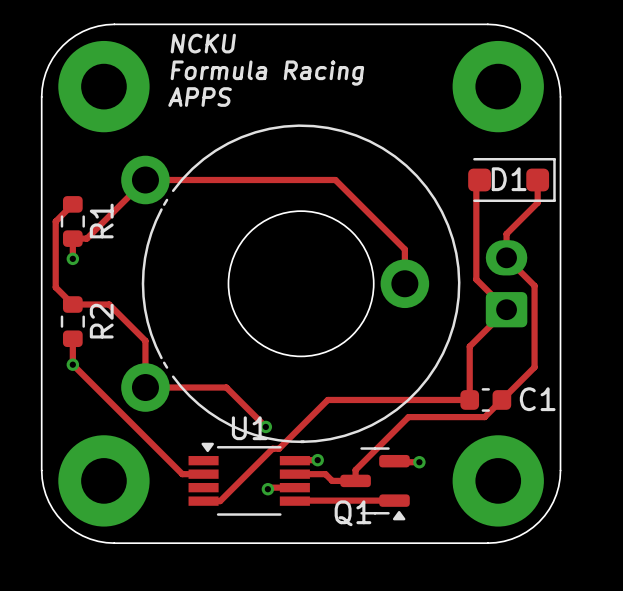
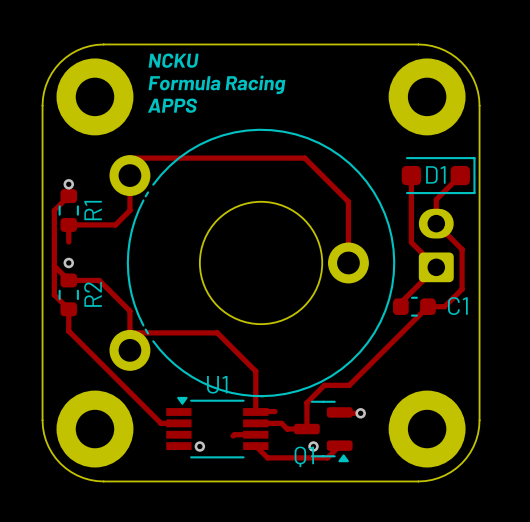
track: (479, 180) (476, 183) (476, 279) (506, 309) (469, 346) (469, 399) (327, 399) (279, 448) (272, 448) (220, 501) (203, 501) -> (411, 175) (411, 242) (436, 267) (400, 302) (400, 306)
track: (537, 180) (537, 202) (506, 233) (506, 257) (534, 285) (534, 367) (484, 417) (408, 417) (355, 470) -> (460, 175) (436, 199) (436, 223) (462, 249) (462, 289) (444, 306) (427, 306) (349, 385) (324, 385) (306, 402) (306, 419)
via: none -> (68, 184)
track: (86, 238) (145, 180) (335, 180) (404, 249) -> (80, 224) (115, 224) (129, 210) (129, 158) (304, 158) (348, 201) (348, 234)
via position: (72, 258) -> (68, 262)
part position: (506, 283) -> (436, 245)
track: none -> (54, 266) (54, 294) (68, 309)
via: (72, 364) -> none
track: (145, 366) (145, 387) (226, 387) (265, 426) -> (129, 332) (217, 332) (255, 371) (255, 411)
C1 position: (485, 399) -> (414, 306)
via: (265, 426) -> none
via: (317, 460) -> none
via position: (267, 489) -> (199, 446)
track: (394, 500) (294, 501) -> (339, 445) (327, 457) (267, 457) (255, 446)
via: none -> (313, 446)

